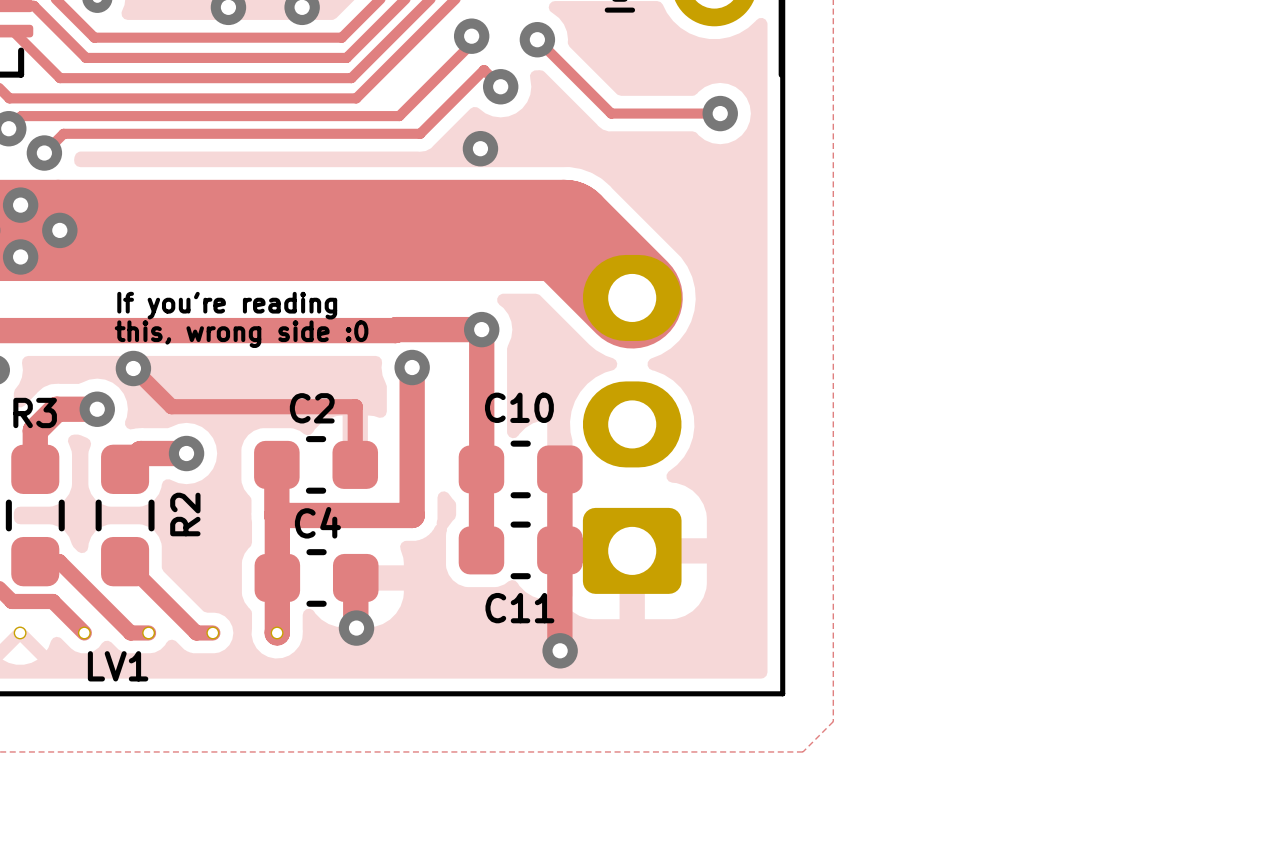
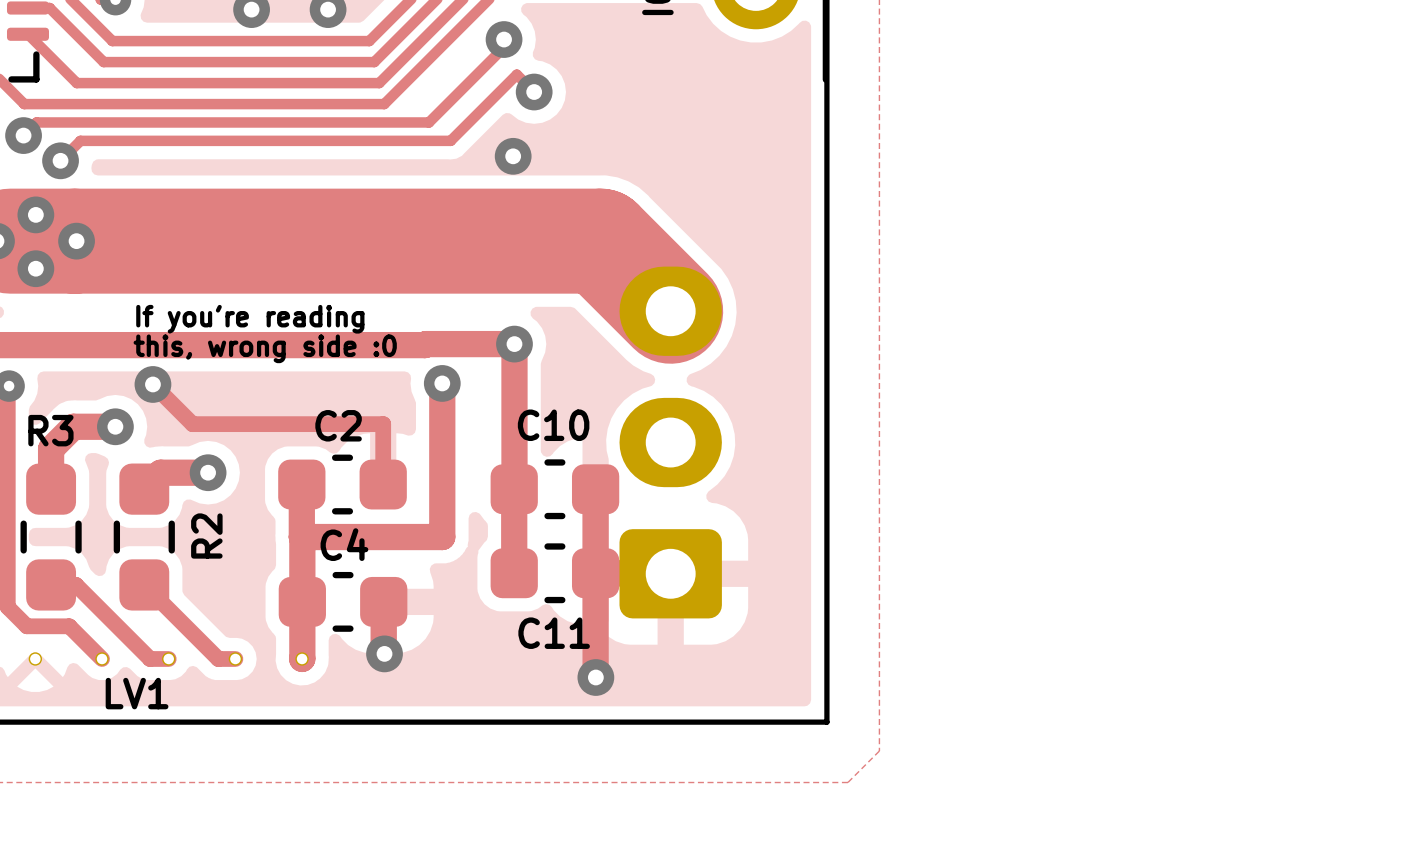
track: (537, 39) (611, 113) (720, 113) -> none
via: (537, 39) -> none
via: (720, 113) -> none

